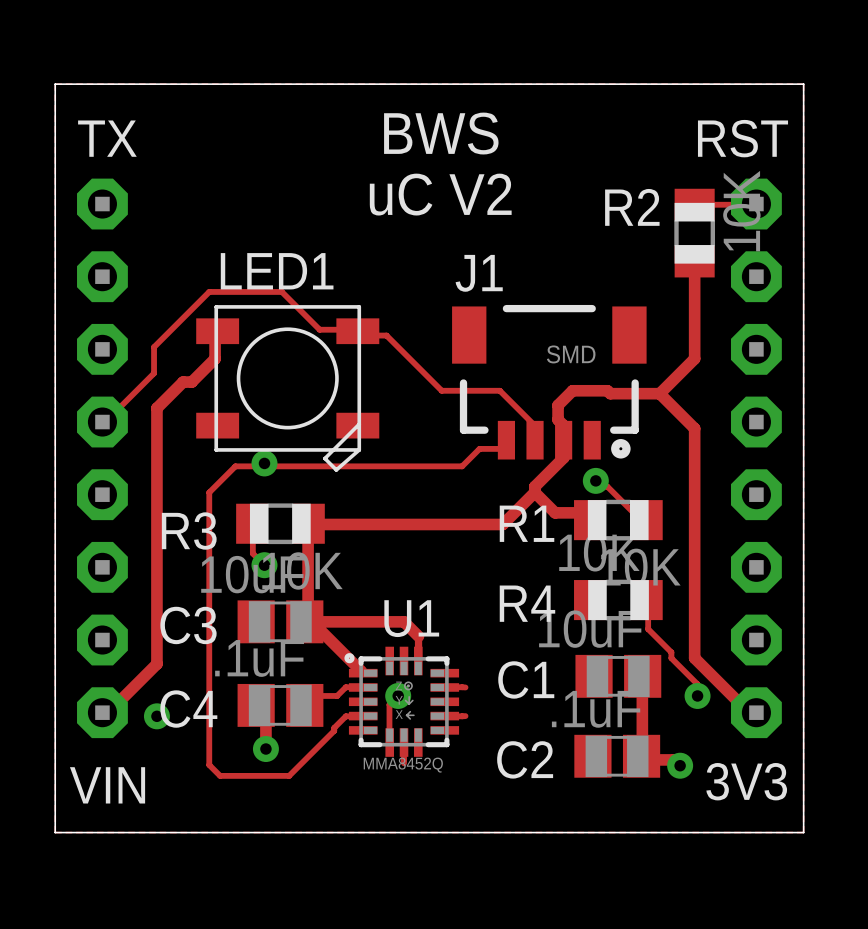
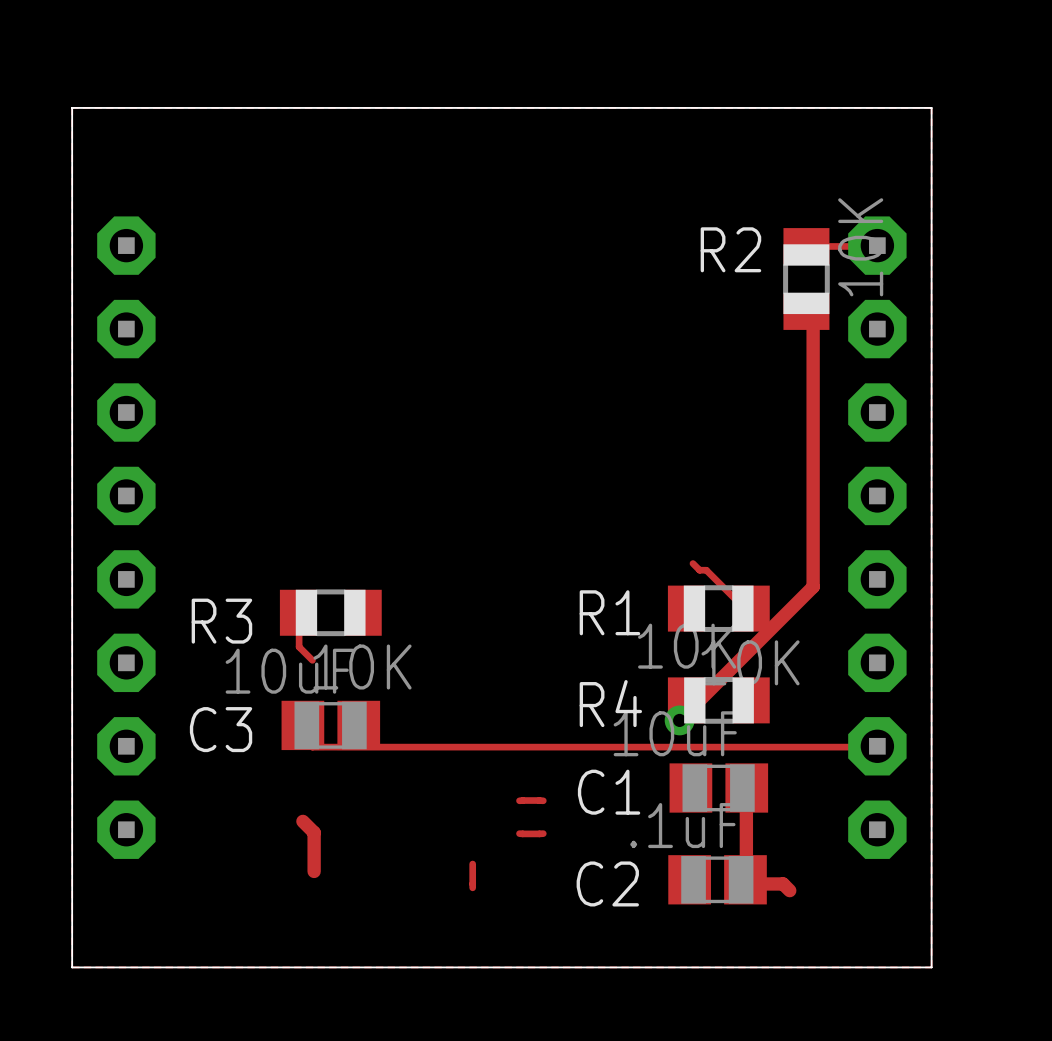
text: BWS (441, 133) -> none
text: TX (107, 138) -> none
text: RST (743, 138) -> none
text: uC V2 (440, 194) -> none
track: none -> (813, 309) (813, 586) (679, 720)
track: (694, 261) (694, 358) (659, 393) -> none
track: (217, 331) (215, 332) (215, 358) (191, 382) (183, 382) (156, 408) (156, 664) (110, 710) (104, 710) (102, 712) -> none
J1: SMD (549, 382) -> none
LED1: (287, 388) -> none
track: (659, 393) (610, 393) (607, 390) (572, 390) (558, 405) (558, 419) (563, 425) (563, 440) -> none
track: (659, 393) (694, 428) (694, 658) (746, 710) (755, 710) (756, 712) -> none
track: (102, 422) (104, 422) (154, 373) (154, 347) (209, 291) (281, 291) (319, 329) (357, 329) (363, 335) (386, 335) (441, 390) (499, 390) (534, 425) (534, 440) -> none
track: (506, 440) (508, 440) (499, 448) (479, 448) (462, 466) (235, 466) (209, 492) (209, 765) (220, 775) (289, 775) (334, 730) (334, 727) (345, 716) (363, 716) -> none
track: (563, 440) (563, 457) (534, 486) (534, 492) -> none
via: (264, 463) -> none
via: (595, 480) -> none
track: (534, 492) (555, 512) (581, 512) (589, 520) -> none
track: (534, 492) (502, 524) (308, 524) (308, 617) (304, 621) (404, 621) (418, 636) (418, 660) -> none
via: (264, 565) -> none
track: (646, 600) (648, 629) (671, 652) (671, 658) (697, 684) (697, 695) -> none
via: none -> (679, 720)
track: (311, 621) (363, 673) -> none
track: none -> (305, 740) (312, 747) (877, 746)
track: (363, 687) (345, 687) (337, 695) (313, 695) (304, 705) -> none
track: (398, 695) (389, 704) (389, 742) -> none
via: (398, 695) -> none
via: (697, 695) -> none
U1: MMA8452Q (401, 701) -> none
C4: .1uF (280, 705) -> none
via: (156, 716) -> none
via: (265, 749) -> none
via: (680, 765) -> none
text: 3V3 (746, 781) -> none
text: VIN (107, 785) -> none

